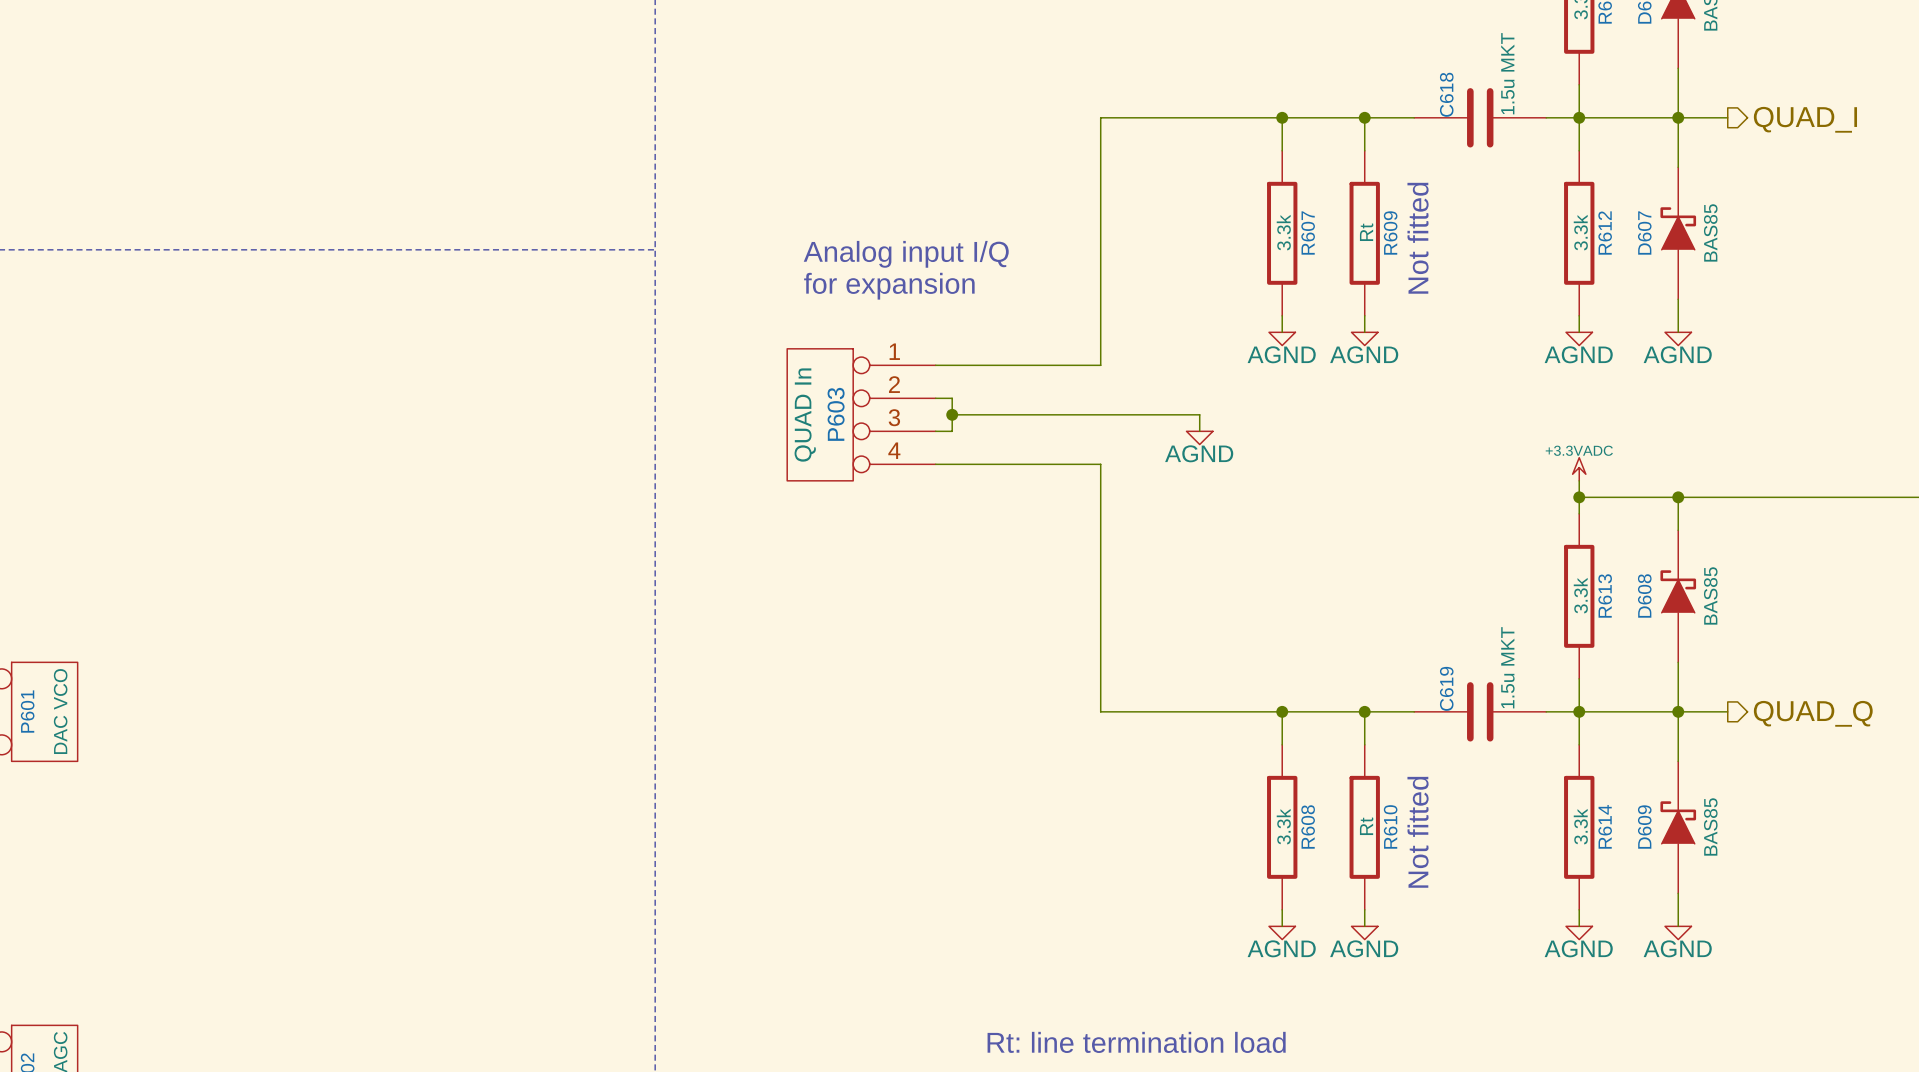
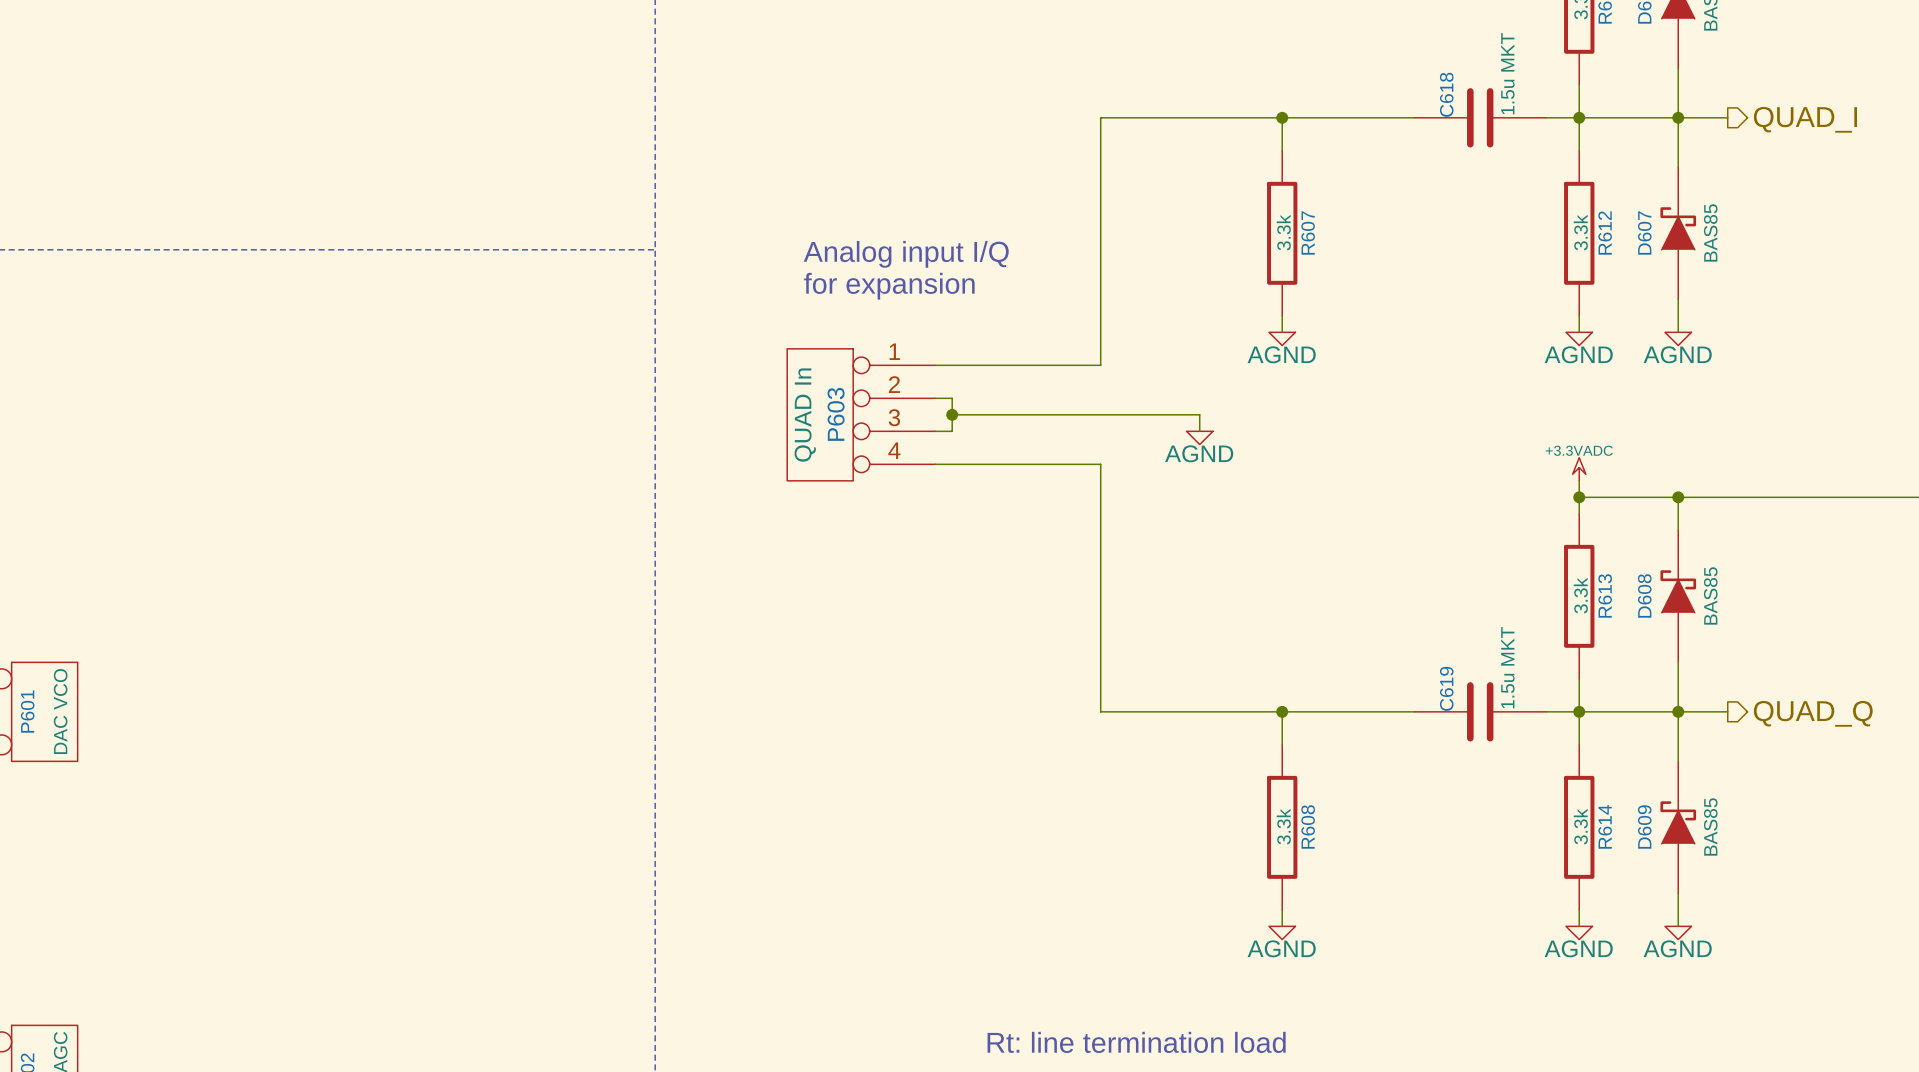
wire: (1364, 117) (1364, 150) -> none
junction: (1364, 117) -> none
R609: Rt (1364, 233) -> none
text: Not fitted (1418, 238) -> none
wire: (1364, 315) (1364, 332) -> none
power symbol: AGND (1364, 338) -> none
wire: (1364, 711) (1364, 744) -> none
junction: (1364, 711) -> none
R610: Rt (1364, 827) -> none
text: Not fitted (1418, 832) -> none
wire: (1364, 909) (1364, 926) -> none
power symbol: AGND (1364, 932) -> none

